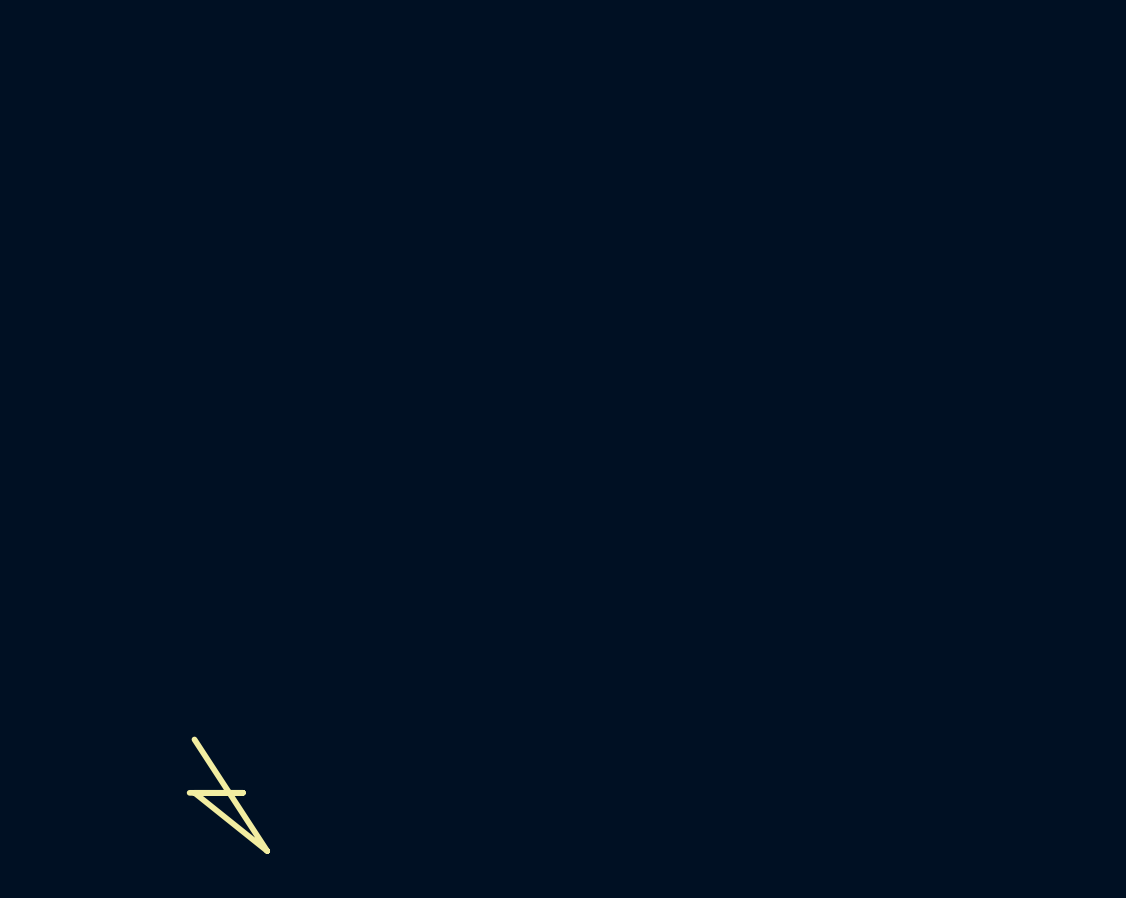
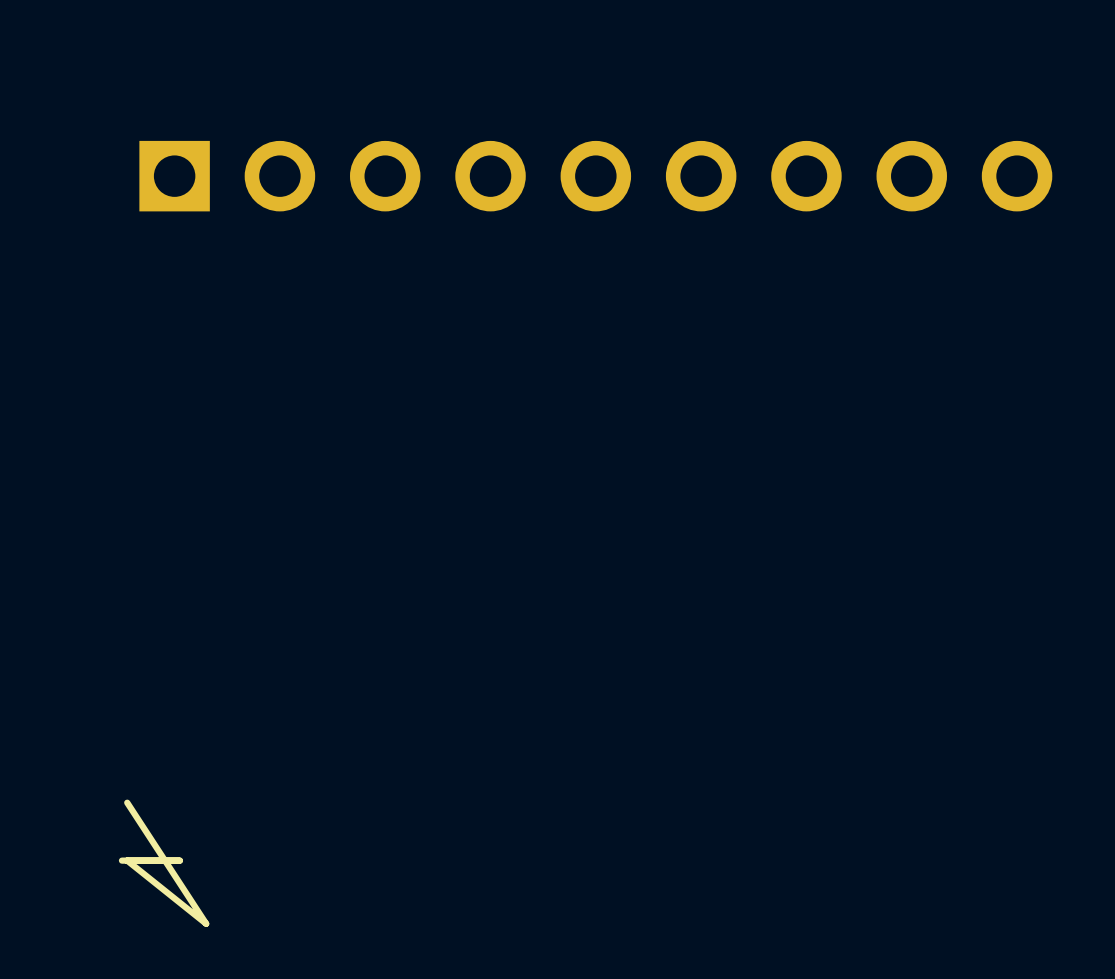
part: none -> (595, 176)

